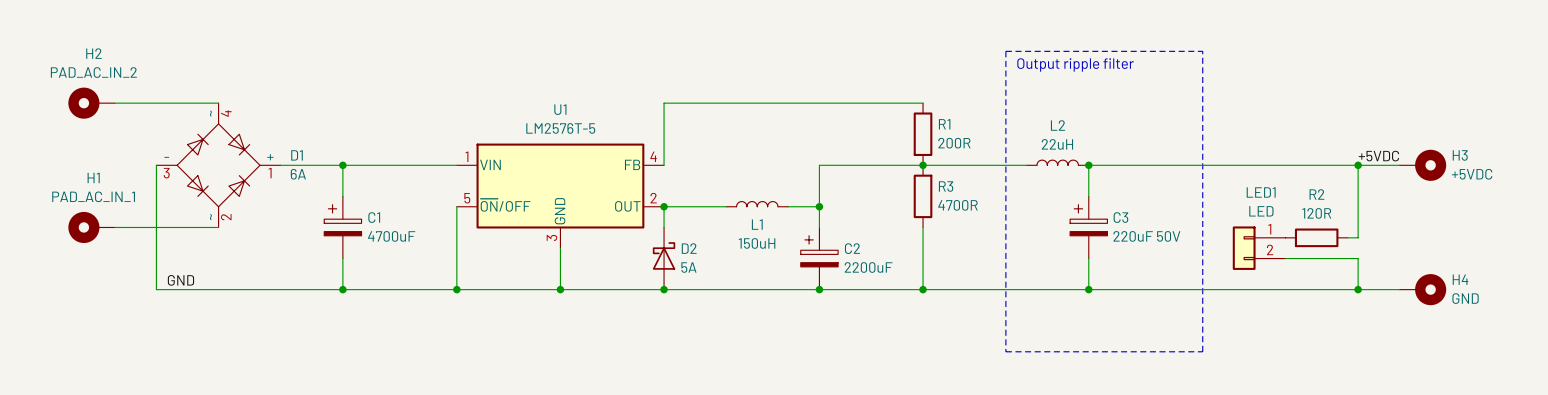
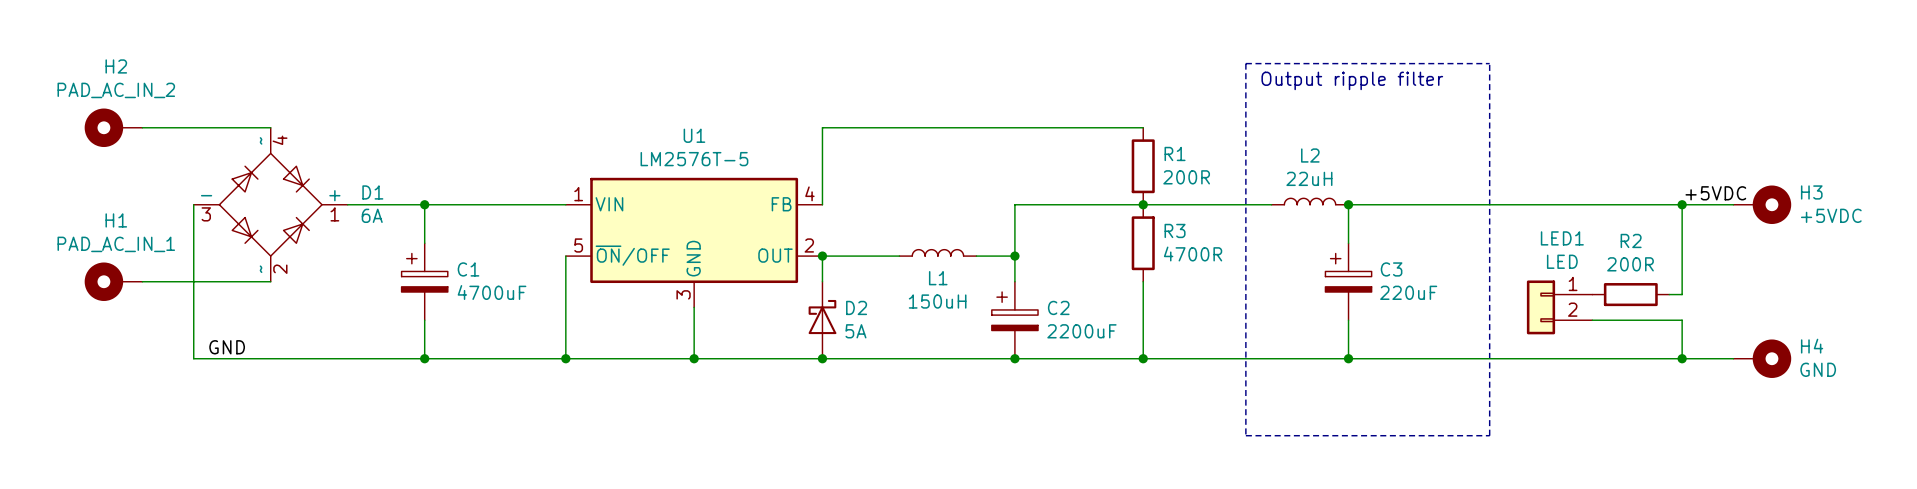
R2 value: 120R (1316, 213) -> 200R (1630, 264)
C3 value: 220uF 50V (1146, 236) -> 220uF (1408, 292)

